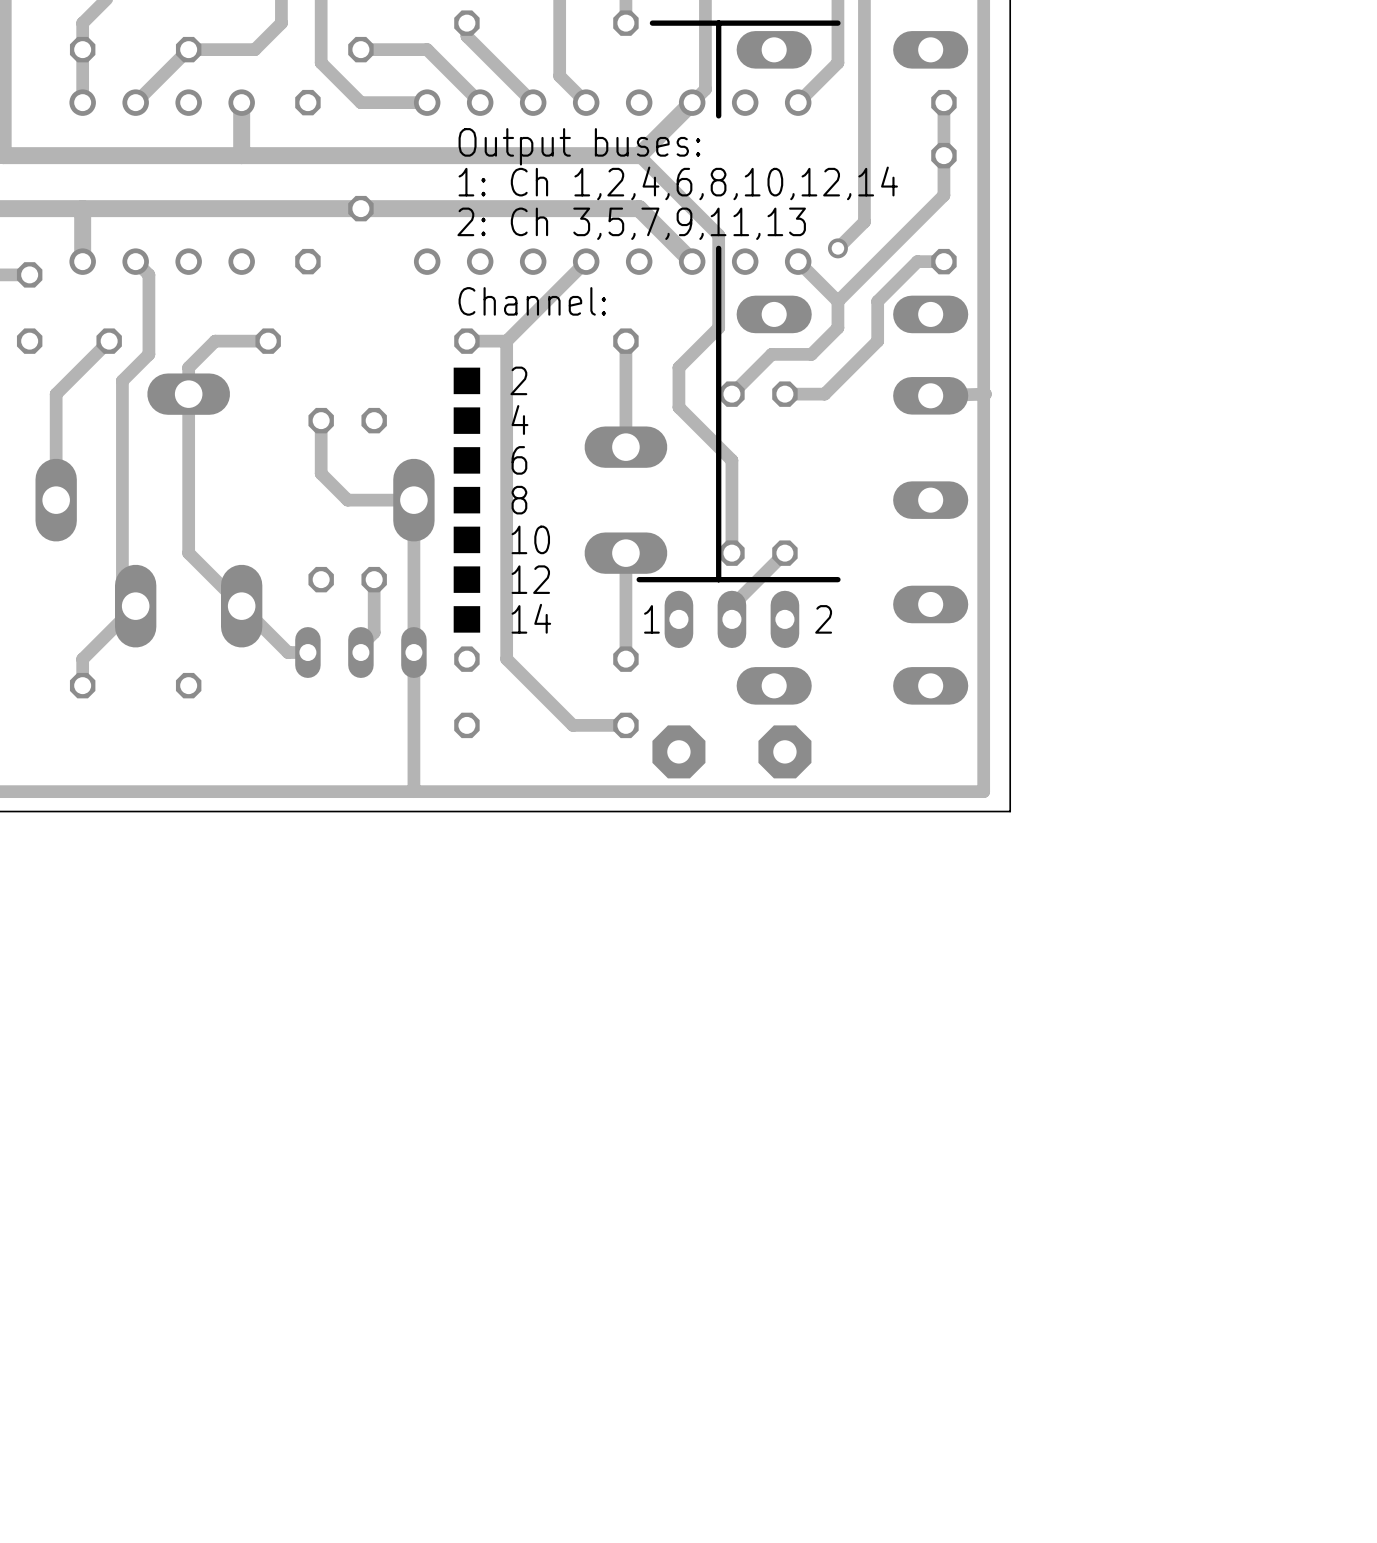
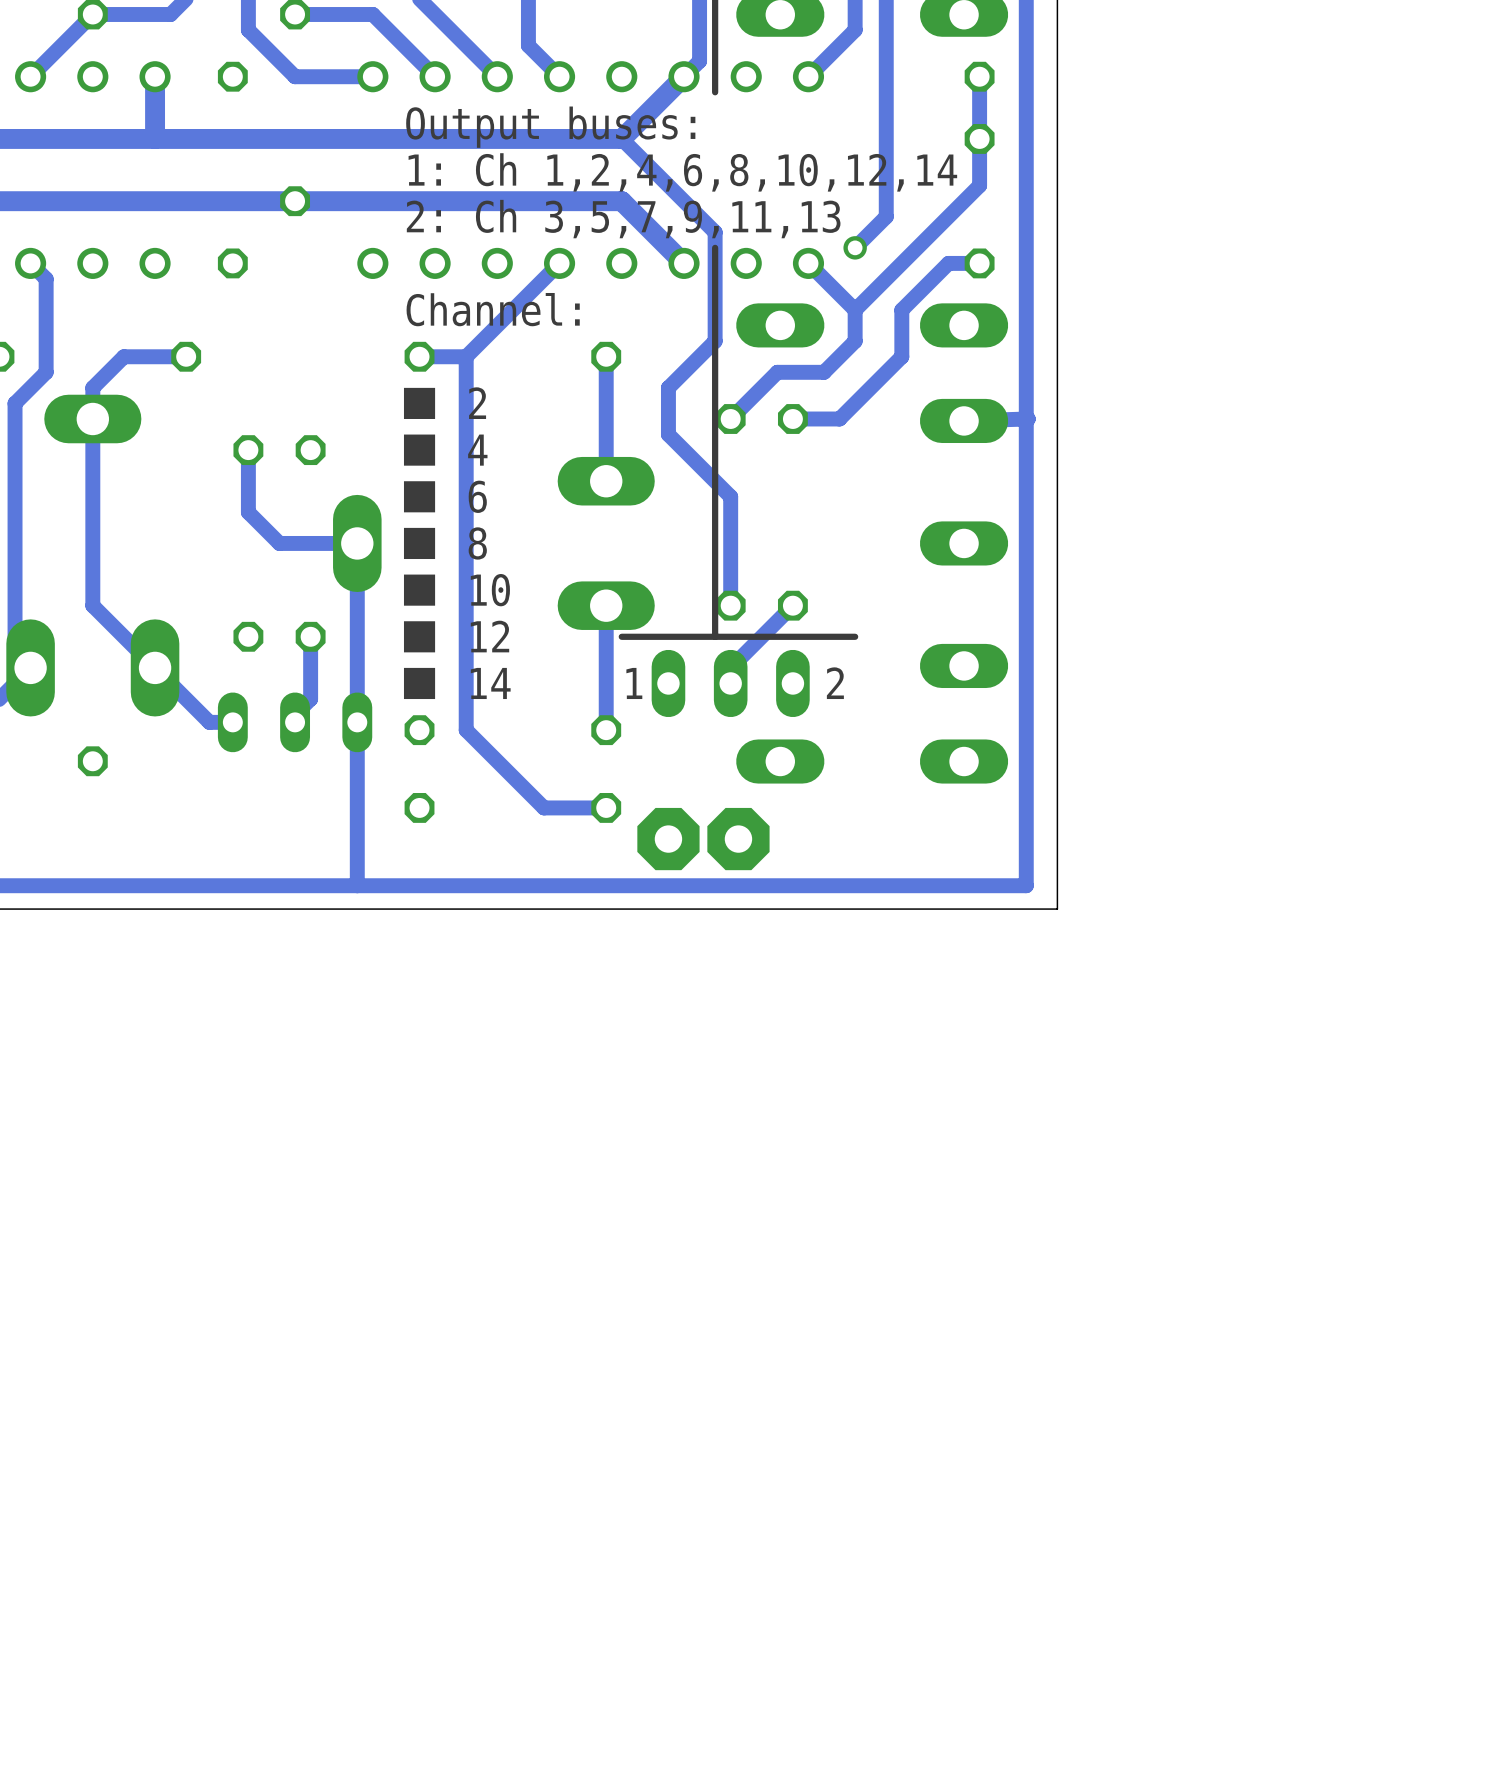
part position: (784, 751) -> (738, 839)

